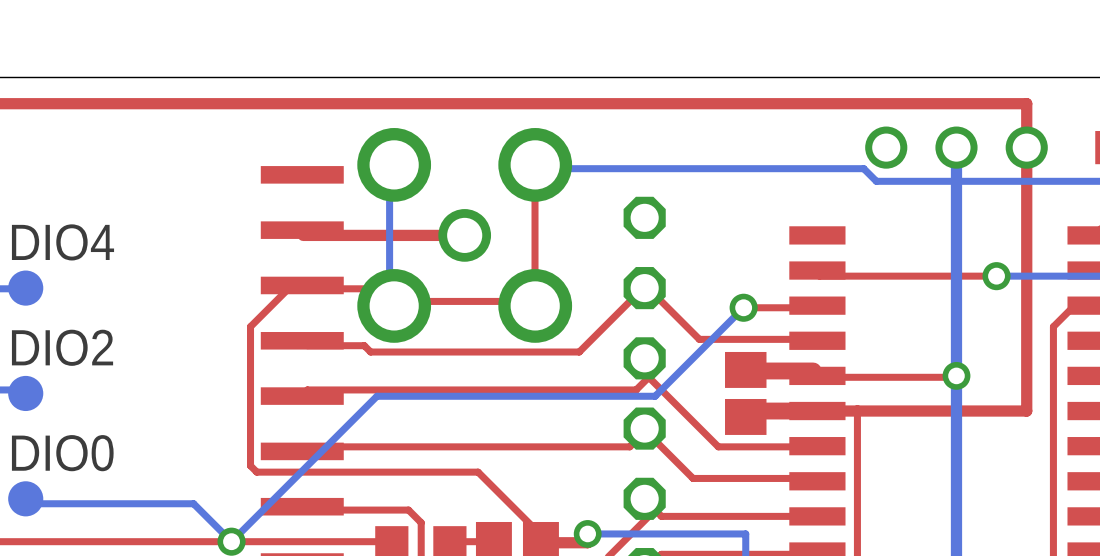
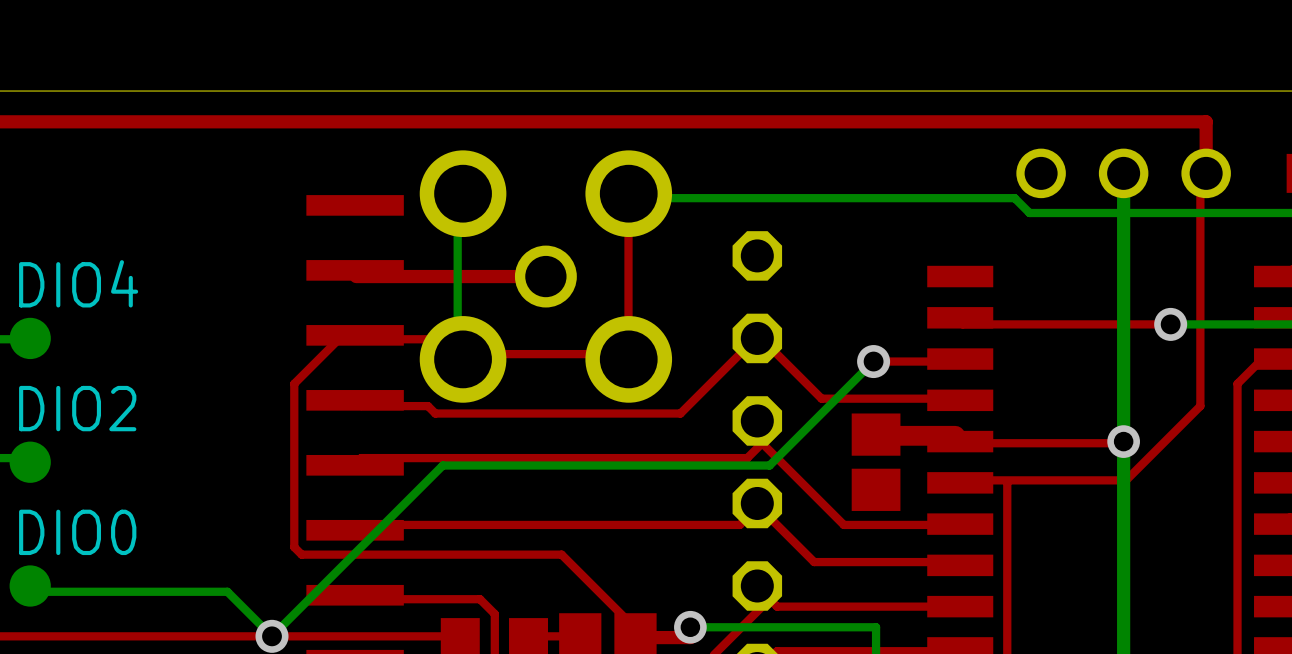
top track: (1026, 147) (1026, 411) (745, 411) (743, 415) (745, 416) -> (1206, 173) (1200, 175) (1200, 406) (1126, 480) (962, 480)

